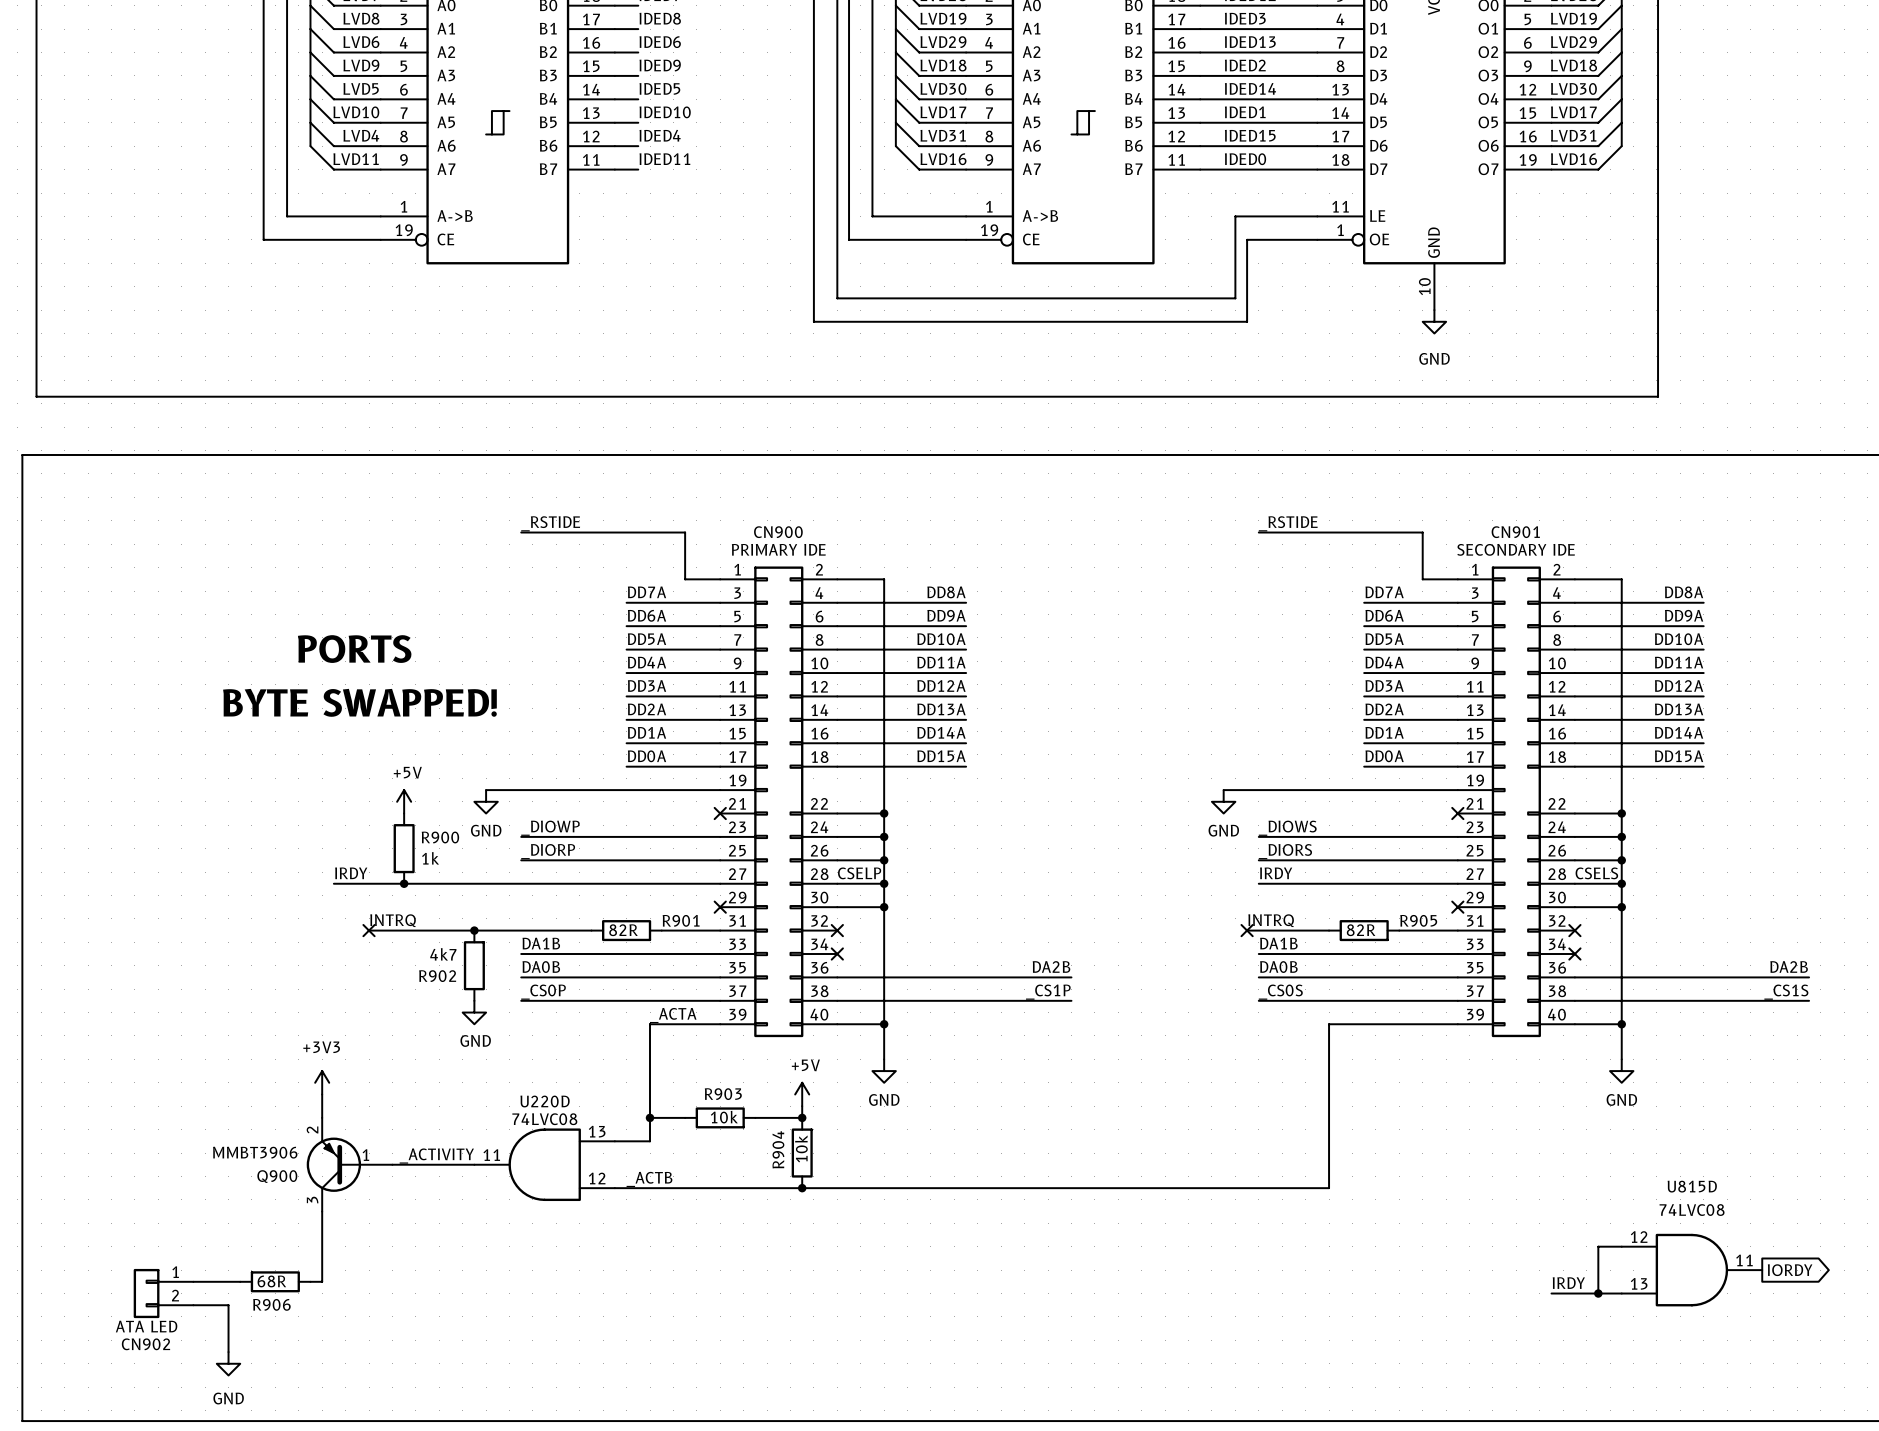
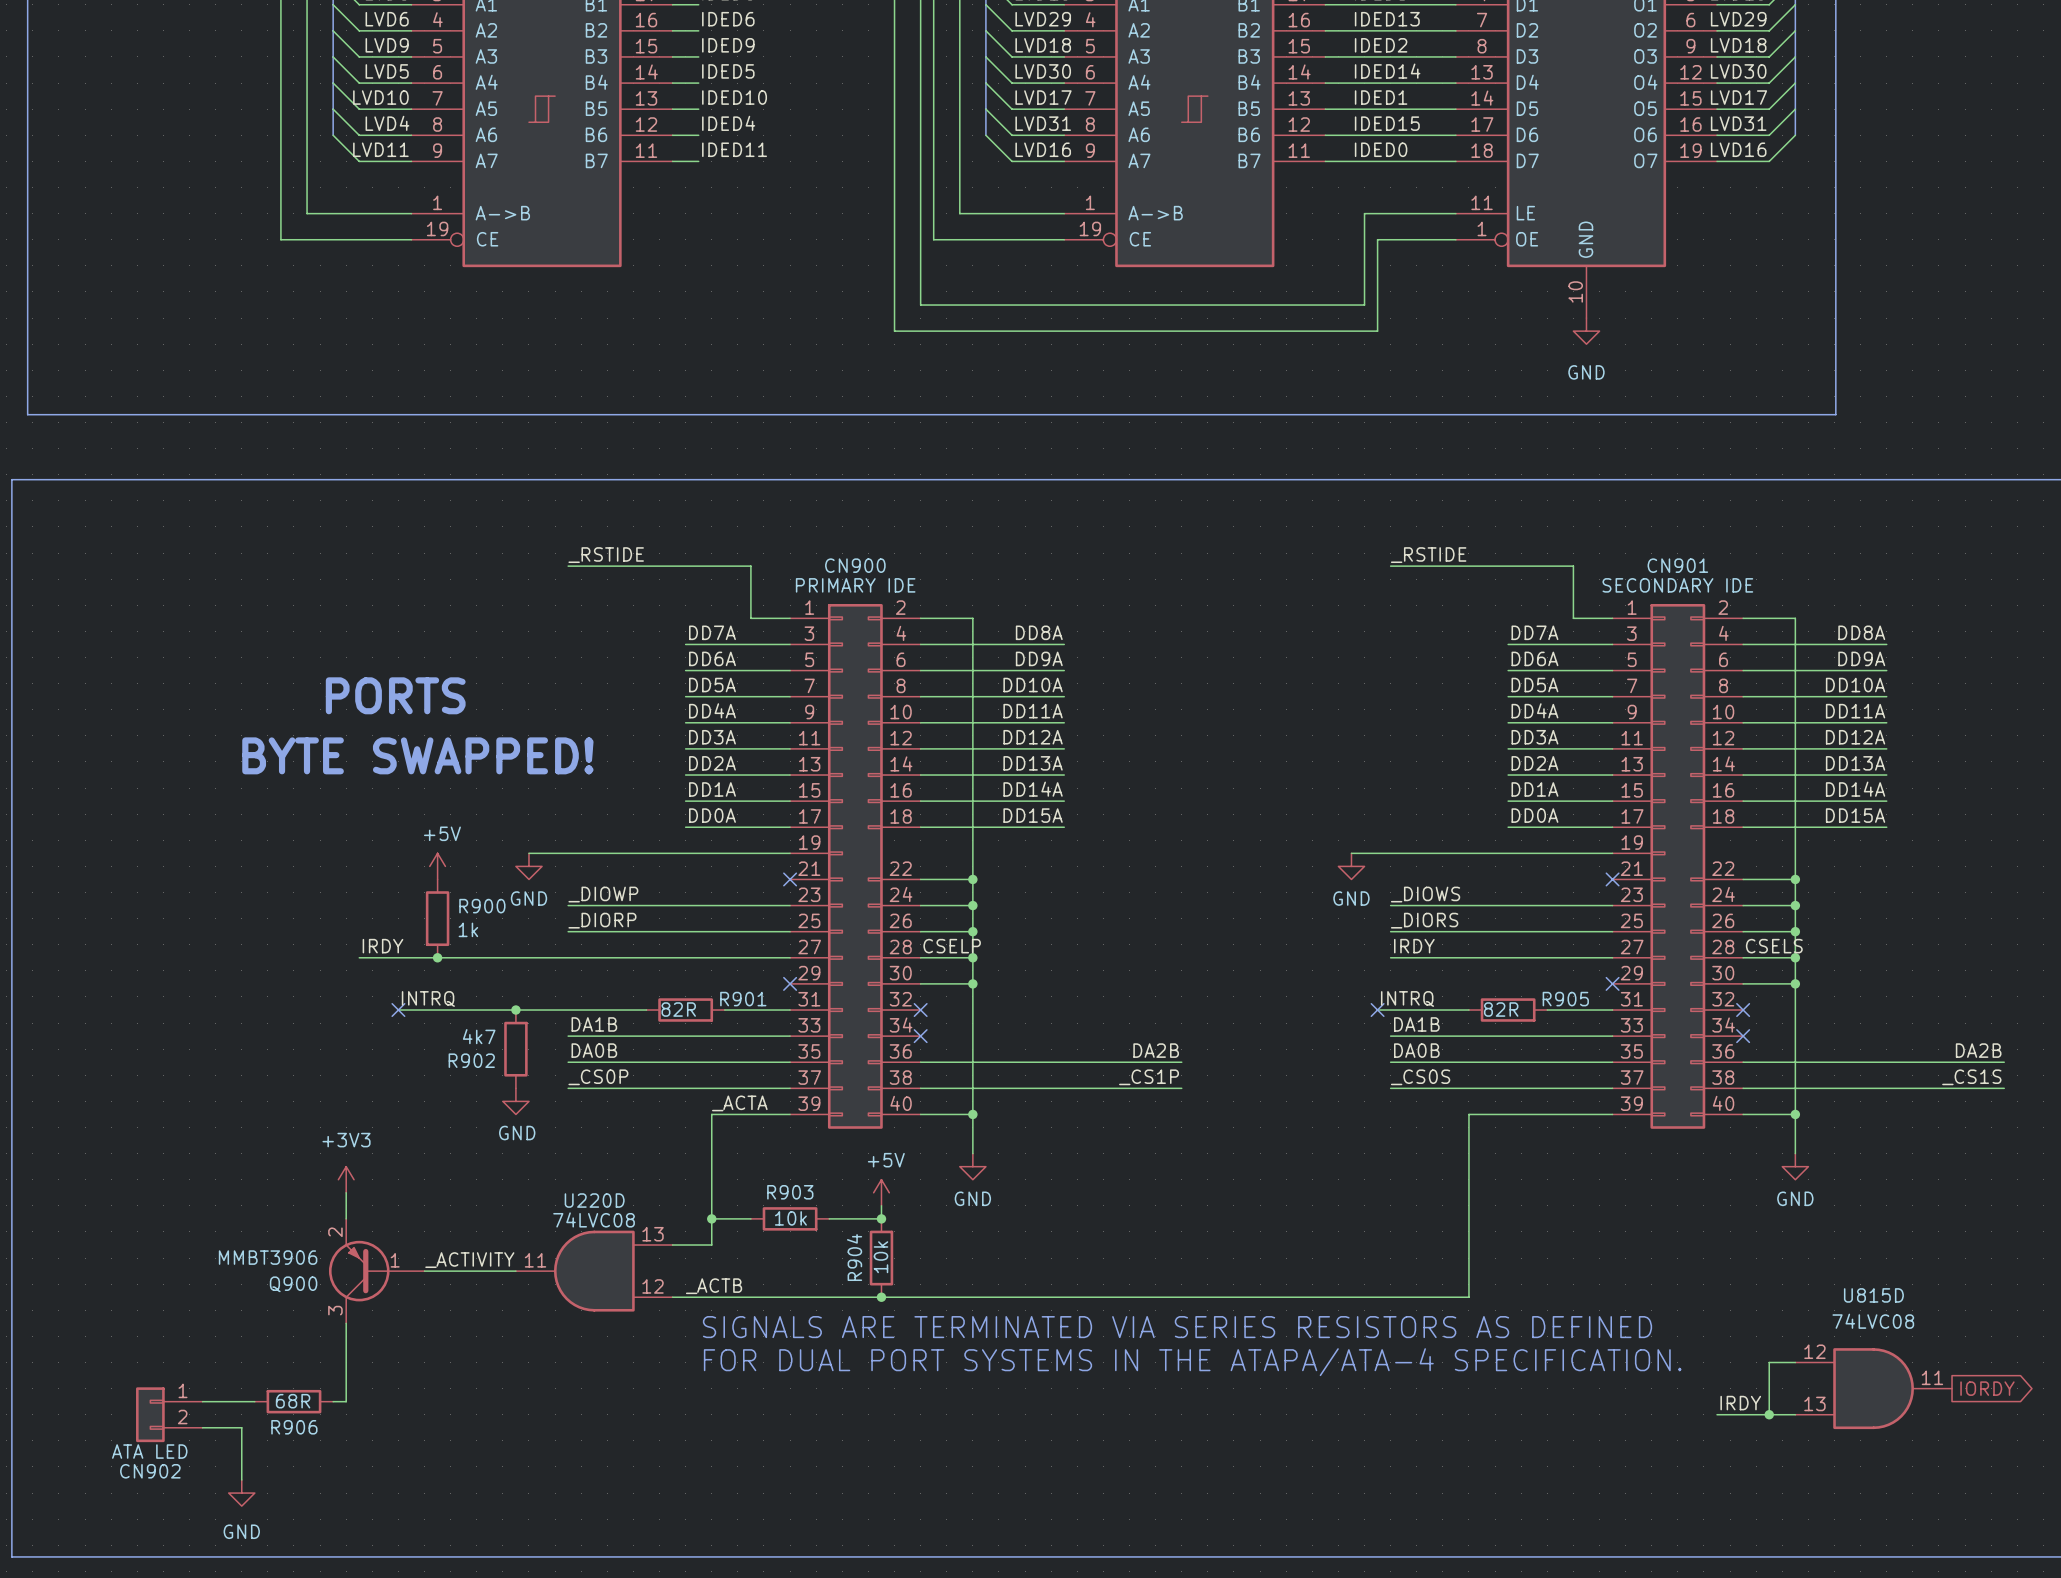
text: none -> SIGNALS ARE TERMINATED VIA SERIES RESISTORS AS DEFINED (1177, 1327)
text: none -> FOR DUAL PORT SYSTEMS IN THE ATAPA/ATA-4 SPECIFICATION. (1192, 1362)

